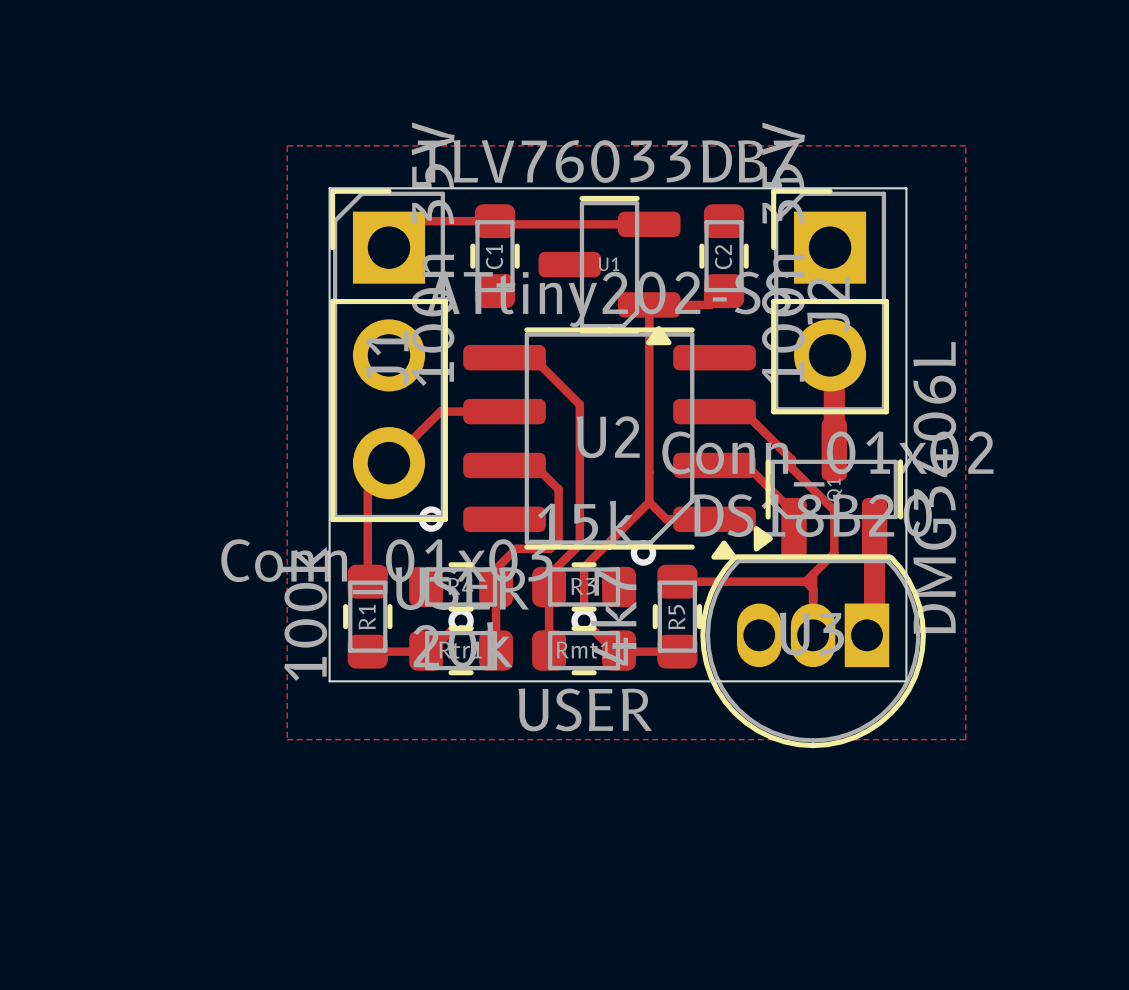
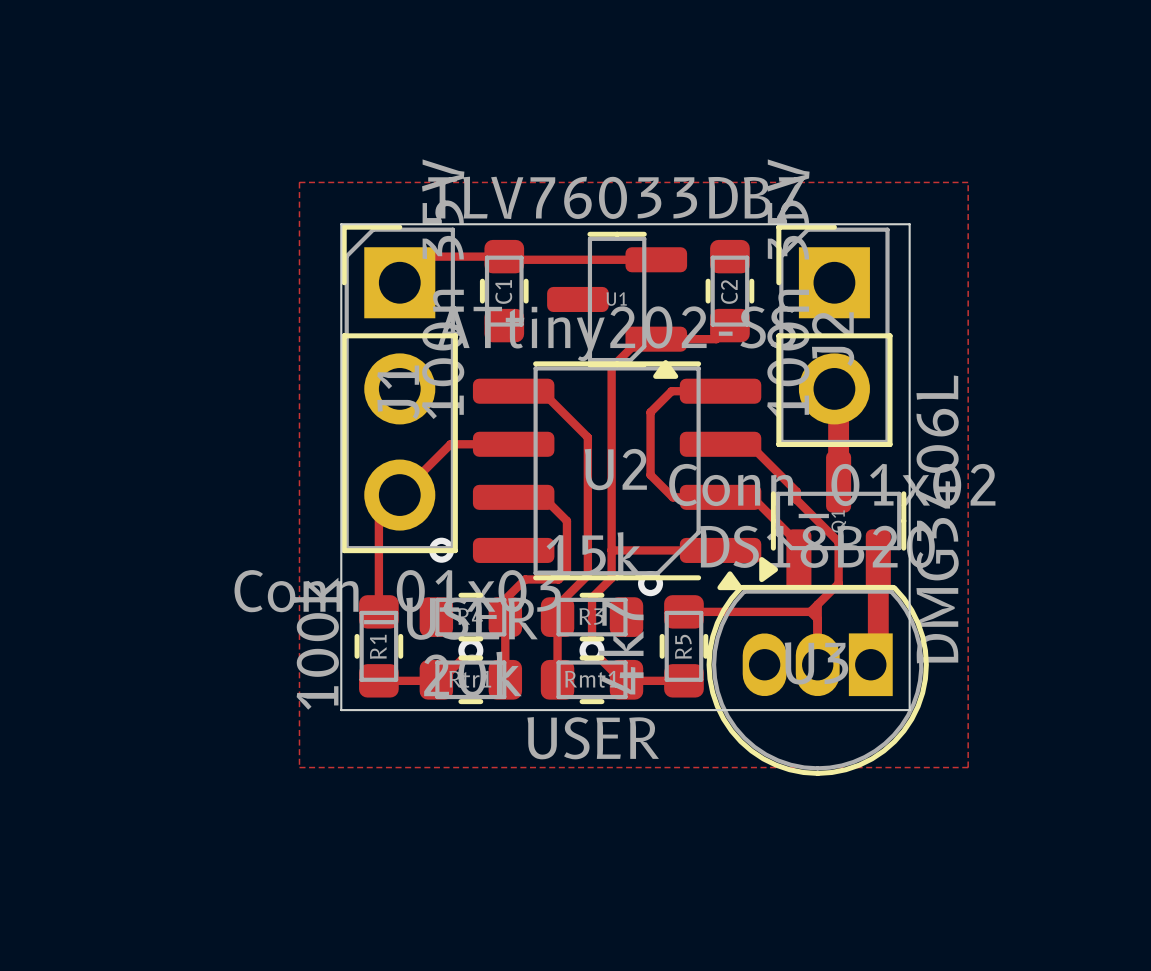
track: (649, 304) (649, 502) -> (656, 339) (640, 339) (611, 367) (611, 578)
track: none -> (720, 391) (671, 391) (650, 412) (650, 475) (672, 497) (720, 497)
track: (649, 502) (666, 519) -> (611, 550) (673, 550)
track: (649, 502) (603, 547) -> none

